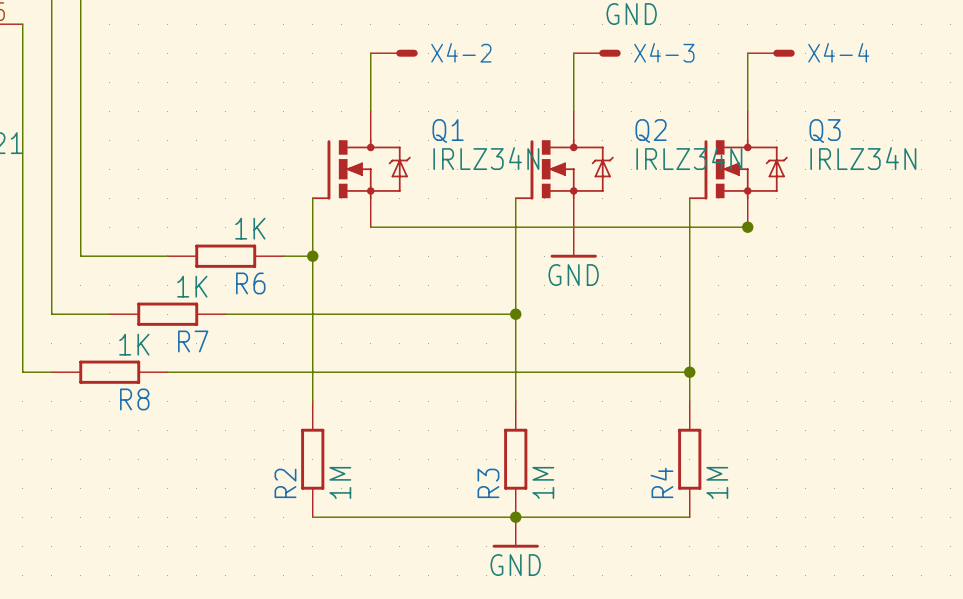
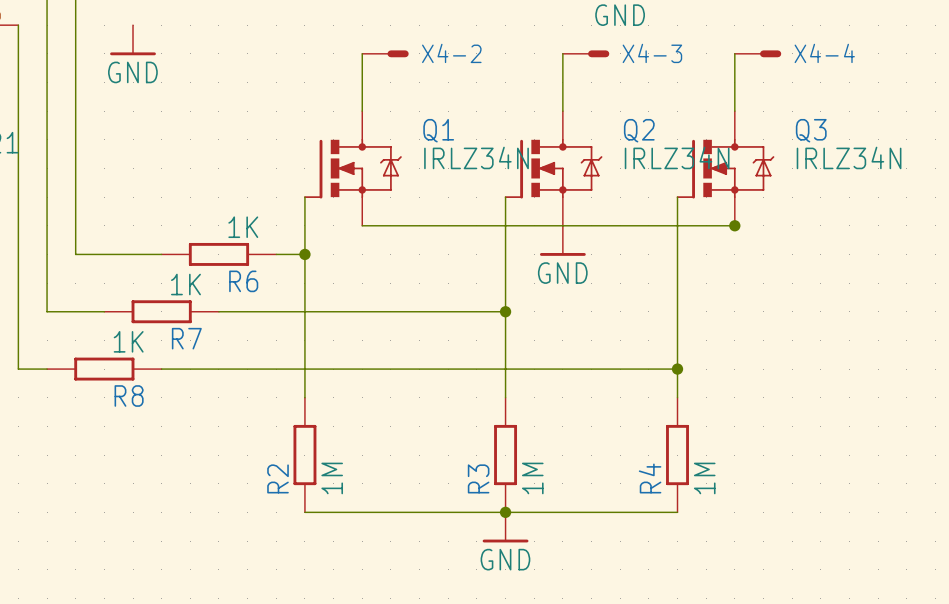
power symbol: none -> GND (133, 40)

